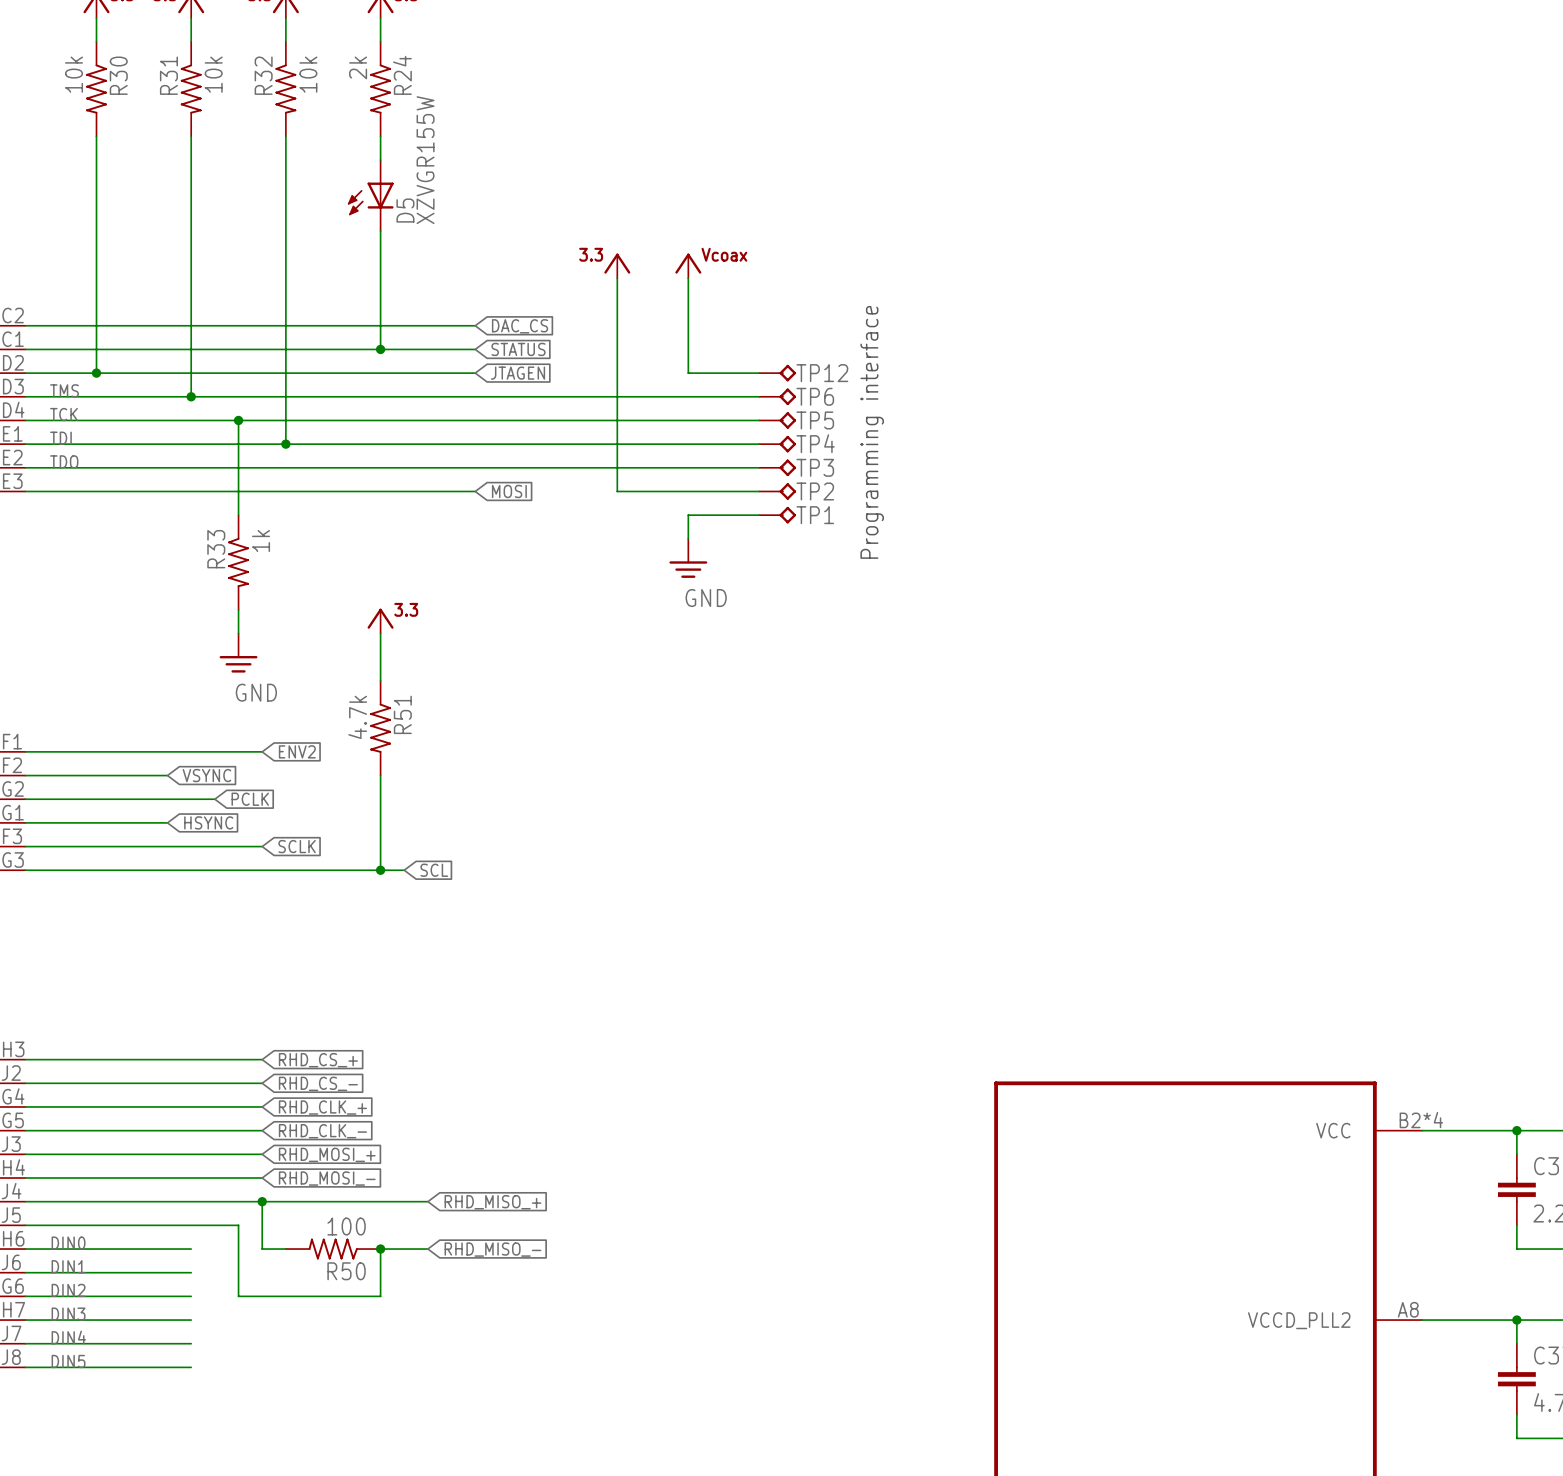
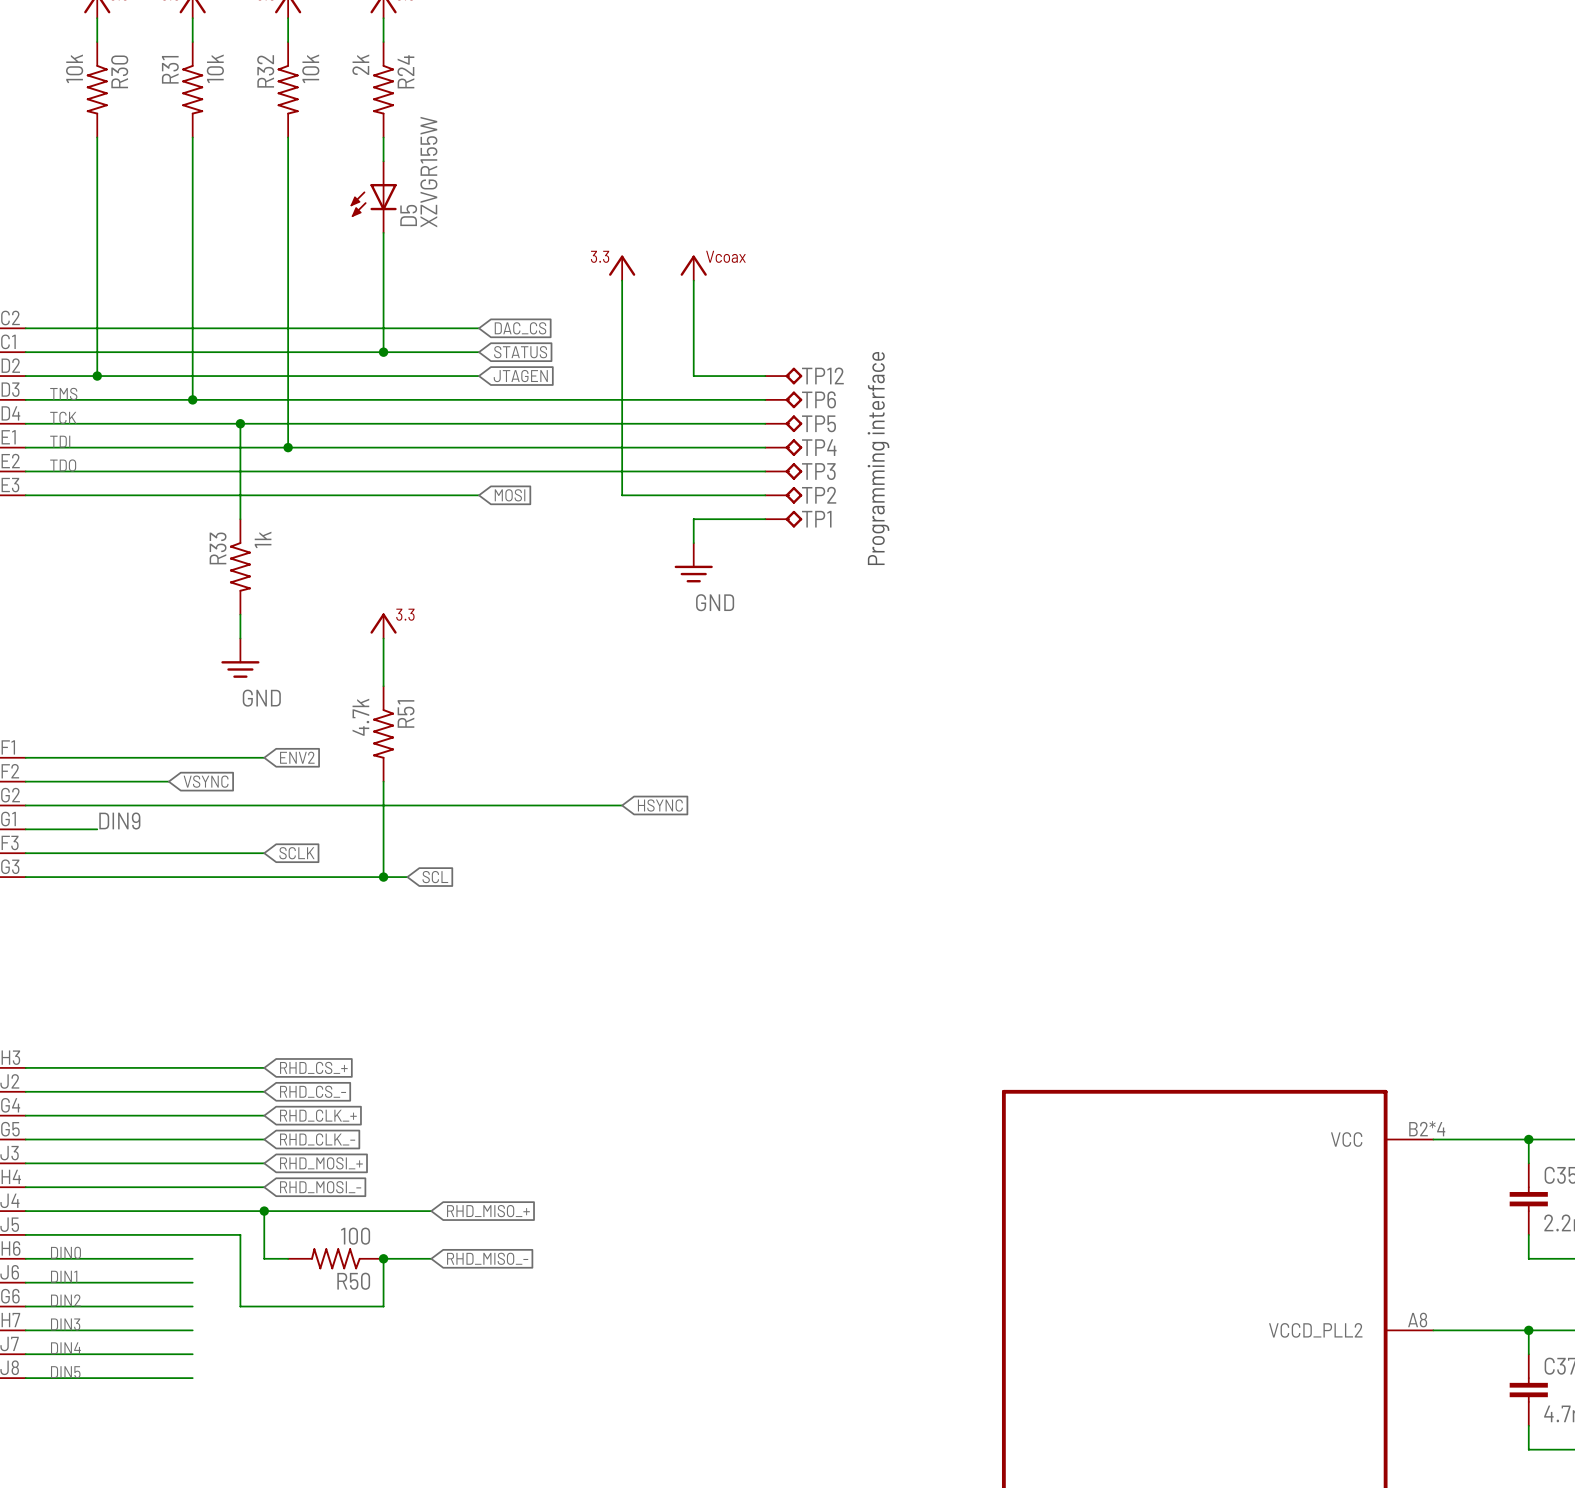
wire: none -> (216, 805) (622, 805)
global label: PCLK (250, 799) -> none
global label: none -> HSYNC (660, 805)
label: none -> DIN9 (119, 821)
wire: (96, 822) (167, 822) -> none
global label: HSYNC (208, 822) -> none

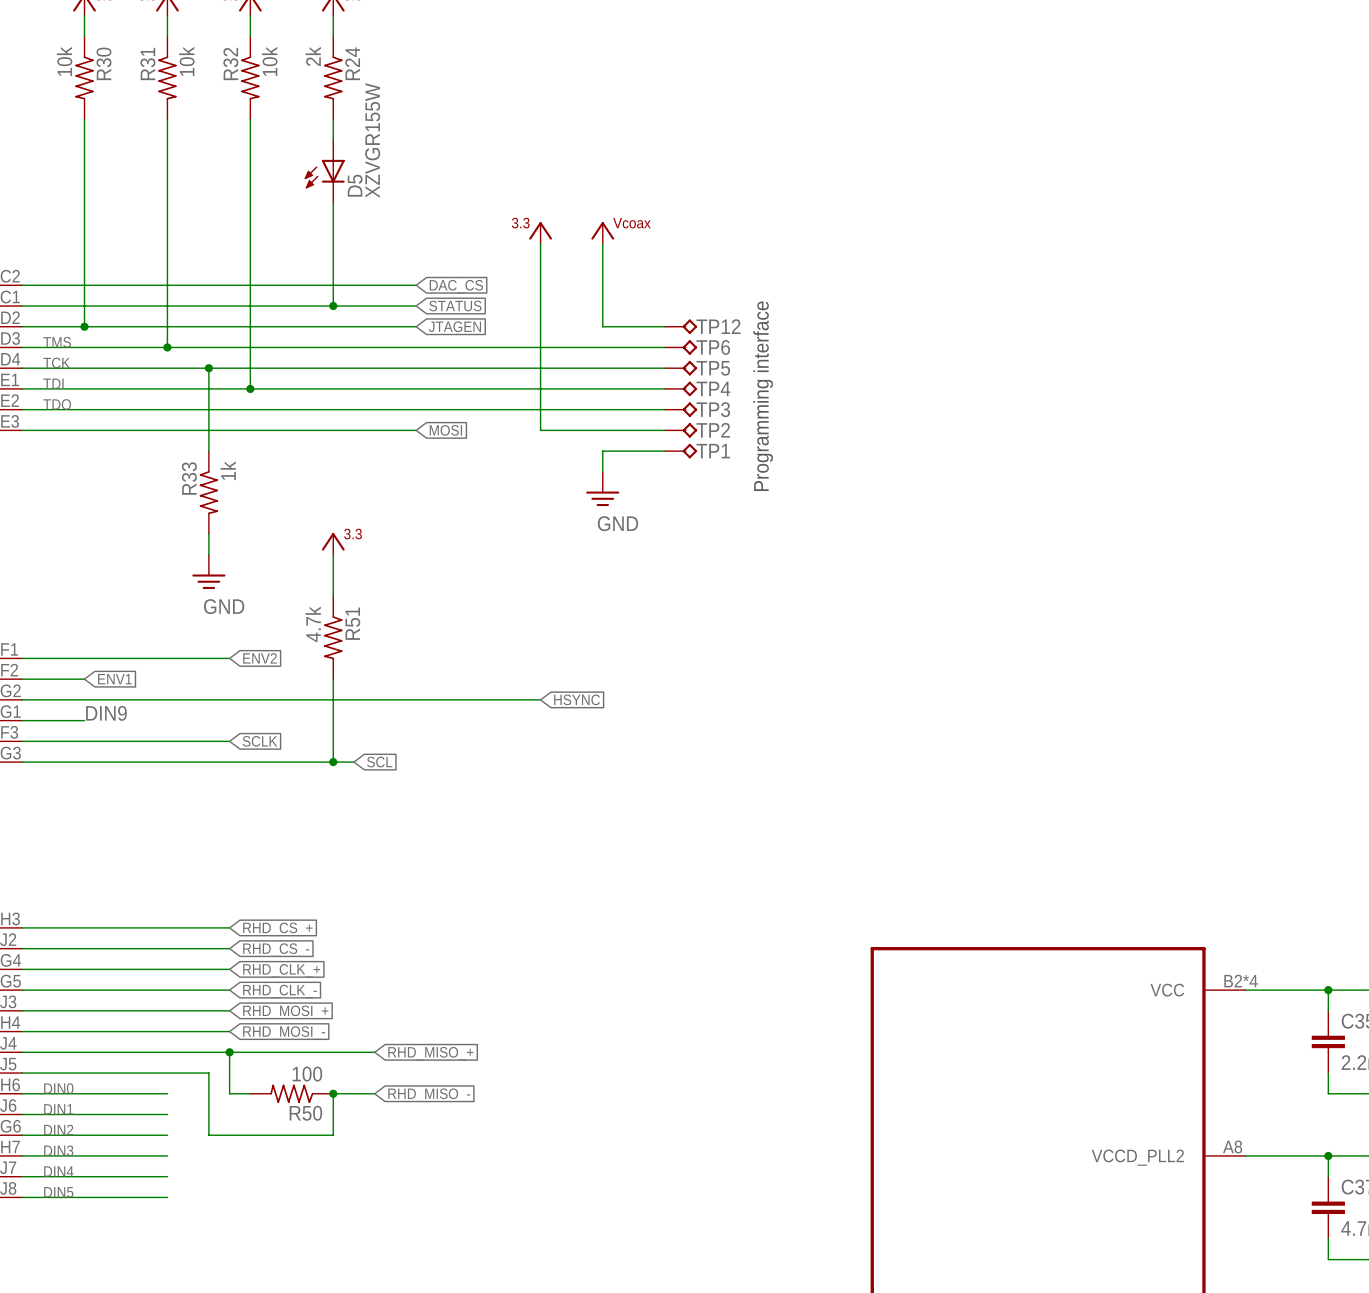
wire: (97, 781) (168, 781) -> none
global label: none -> ENV1 (114, 679)
global label: VSYNC (206, 781) -> none

